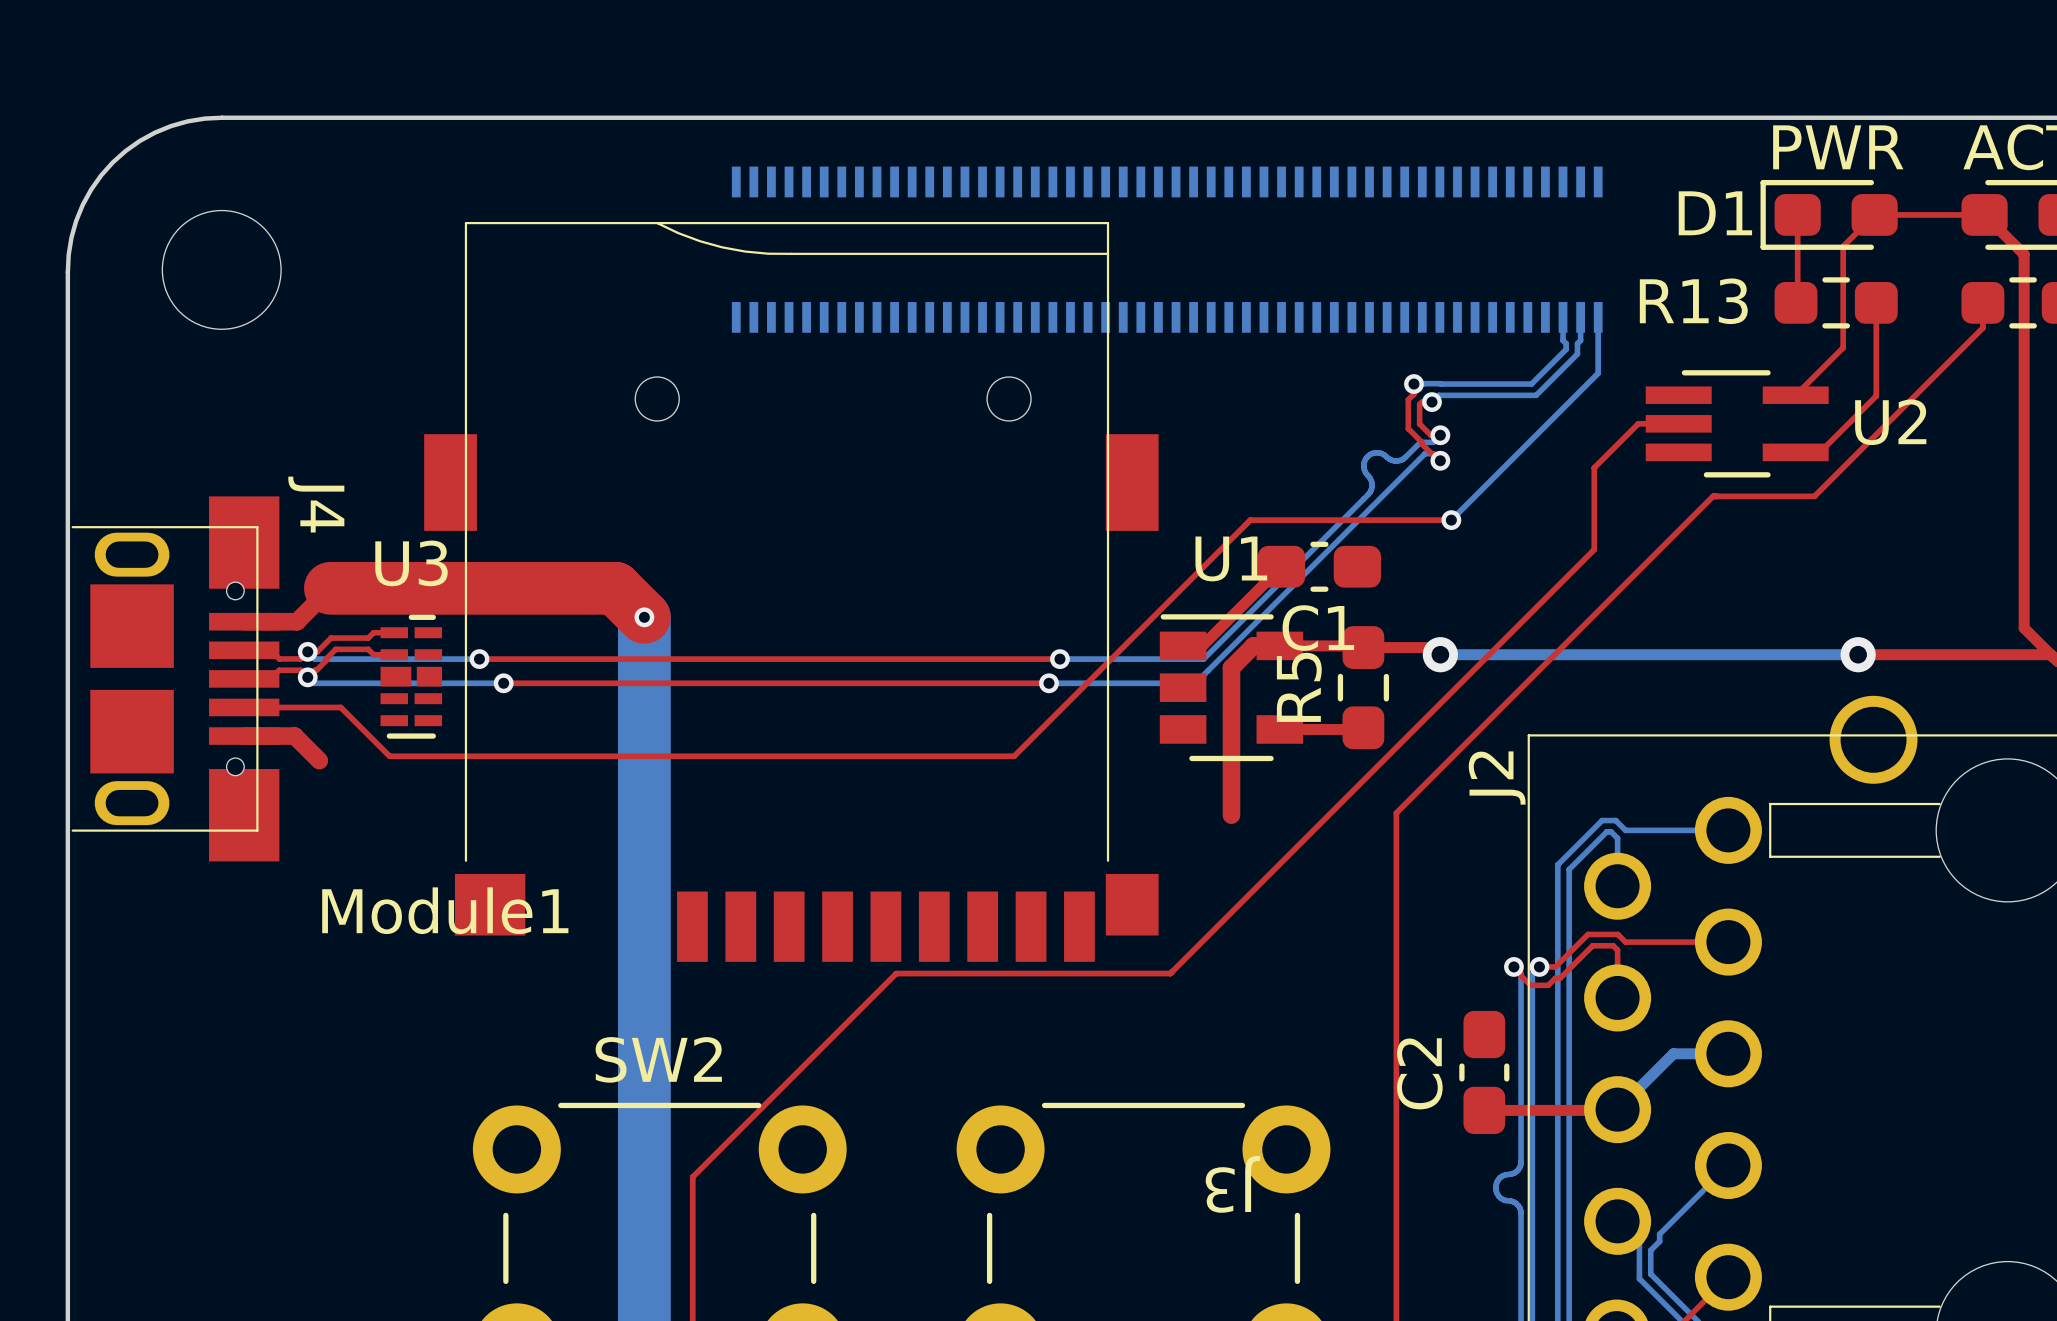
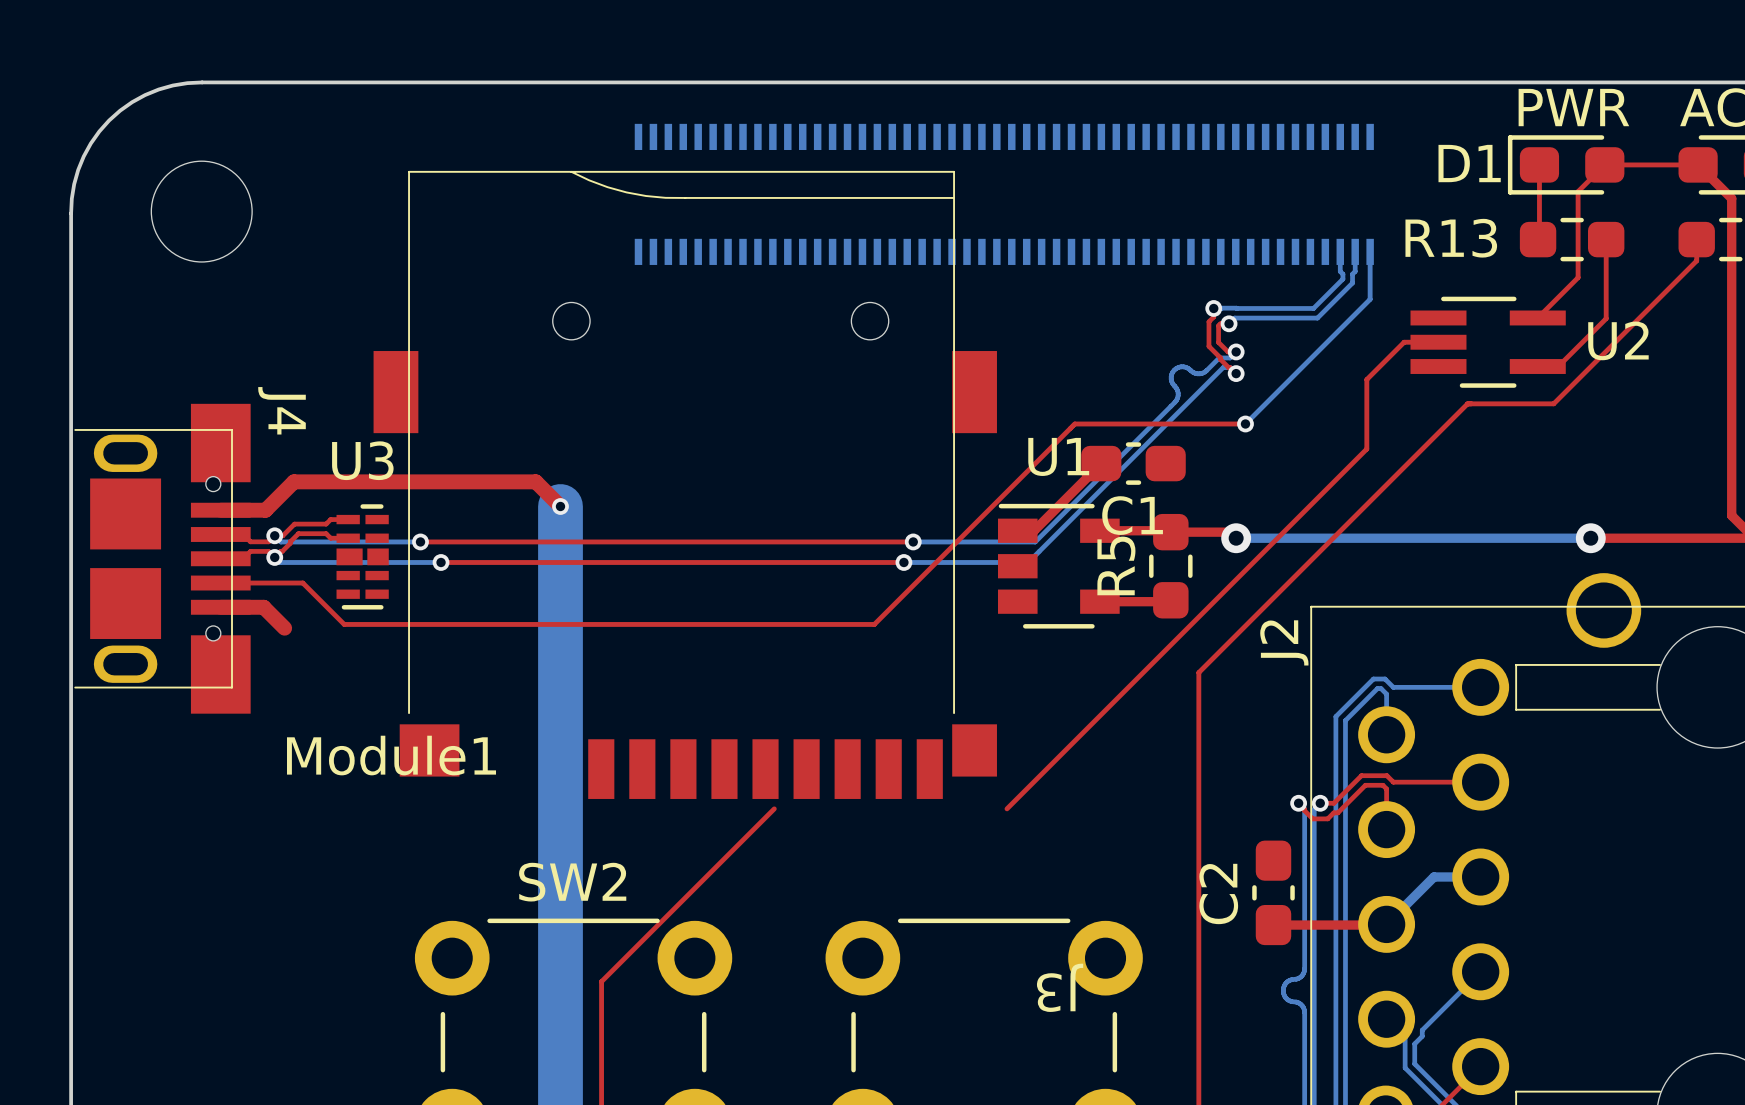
top track width: thick (330, 588) (615, 588) (644, 617) -> thin (293, 481) (535, 481) (560, 506)
top track: (1279, 645) (1253, 645) (1231, 667) (1231, 815) -> none
top track: (896, 973) (1170, 973) -> none

